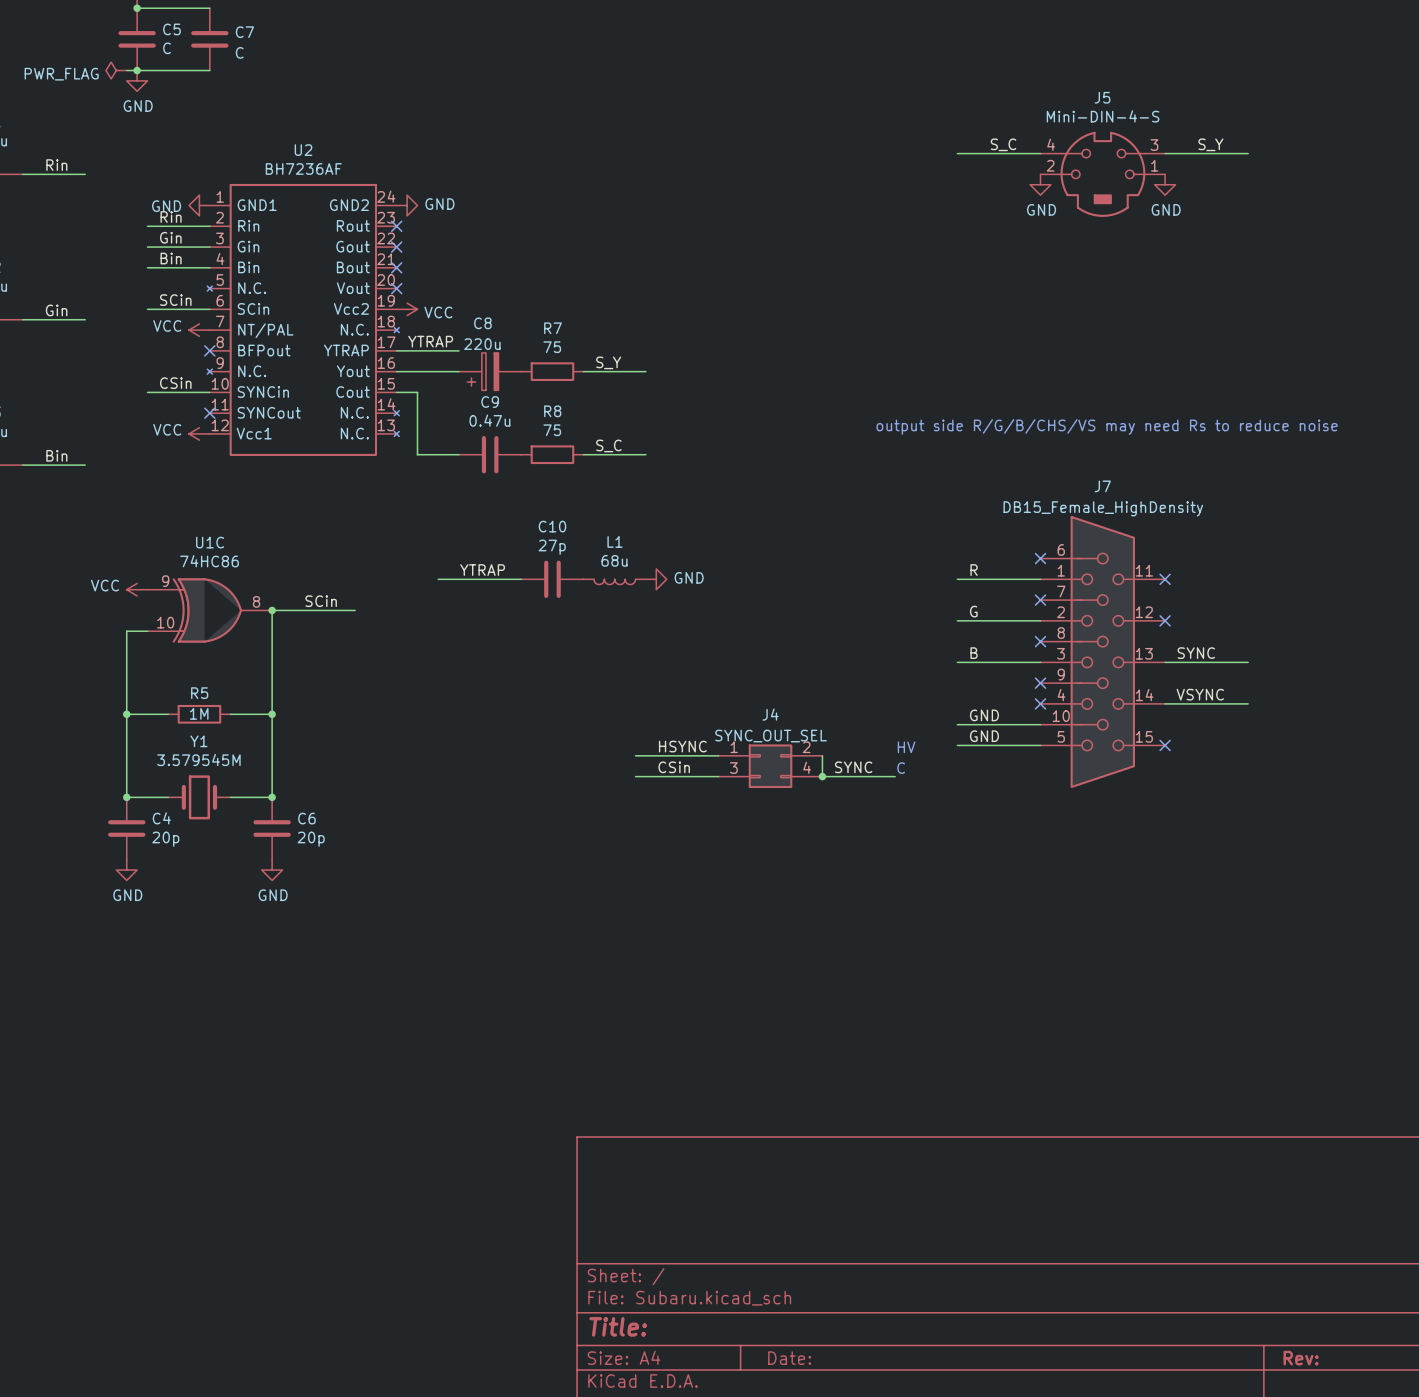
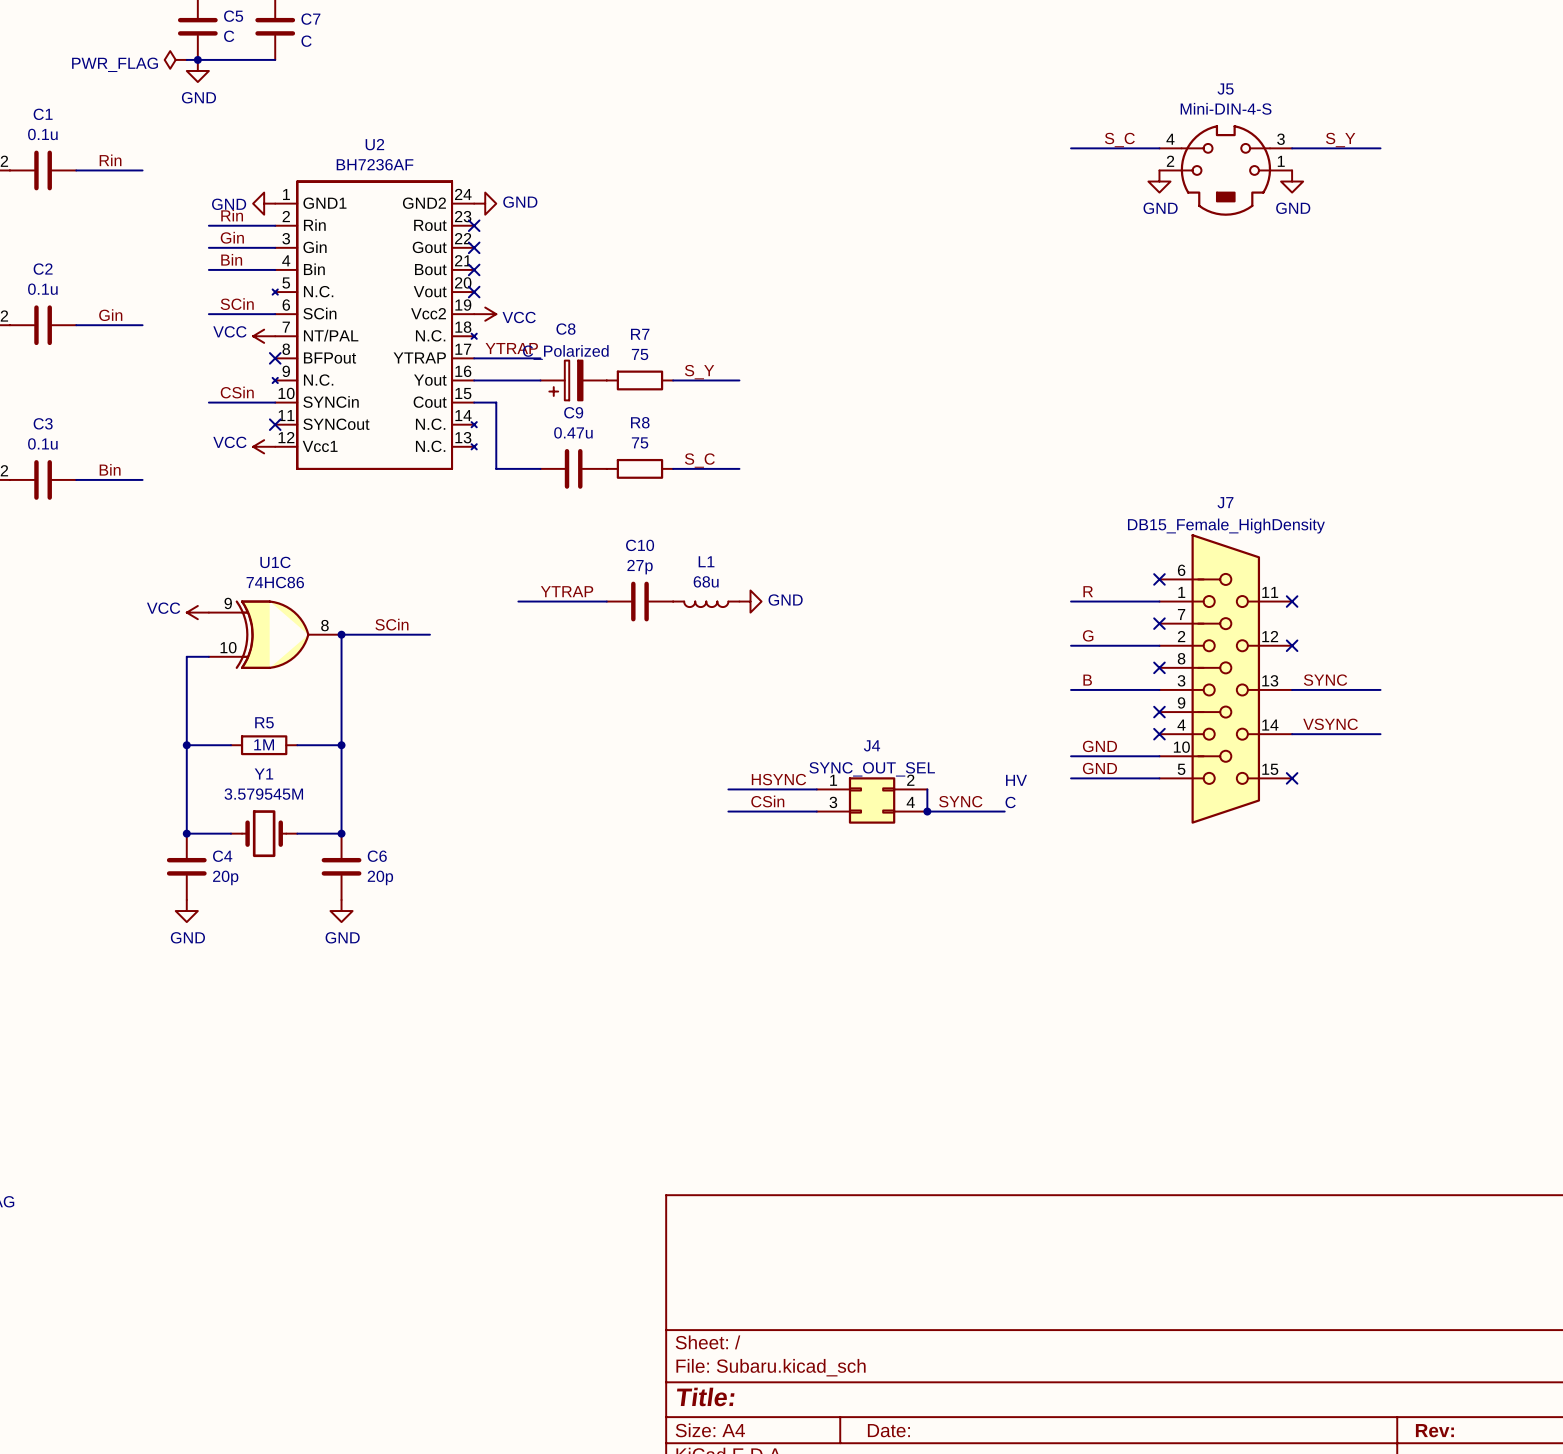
C8 value: 220u (482, 344) -> C_Polarized (565, 352)
text: output side R/G/B/CHS/VS may need Rs to reduce noise (1107, 426) -> none

